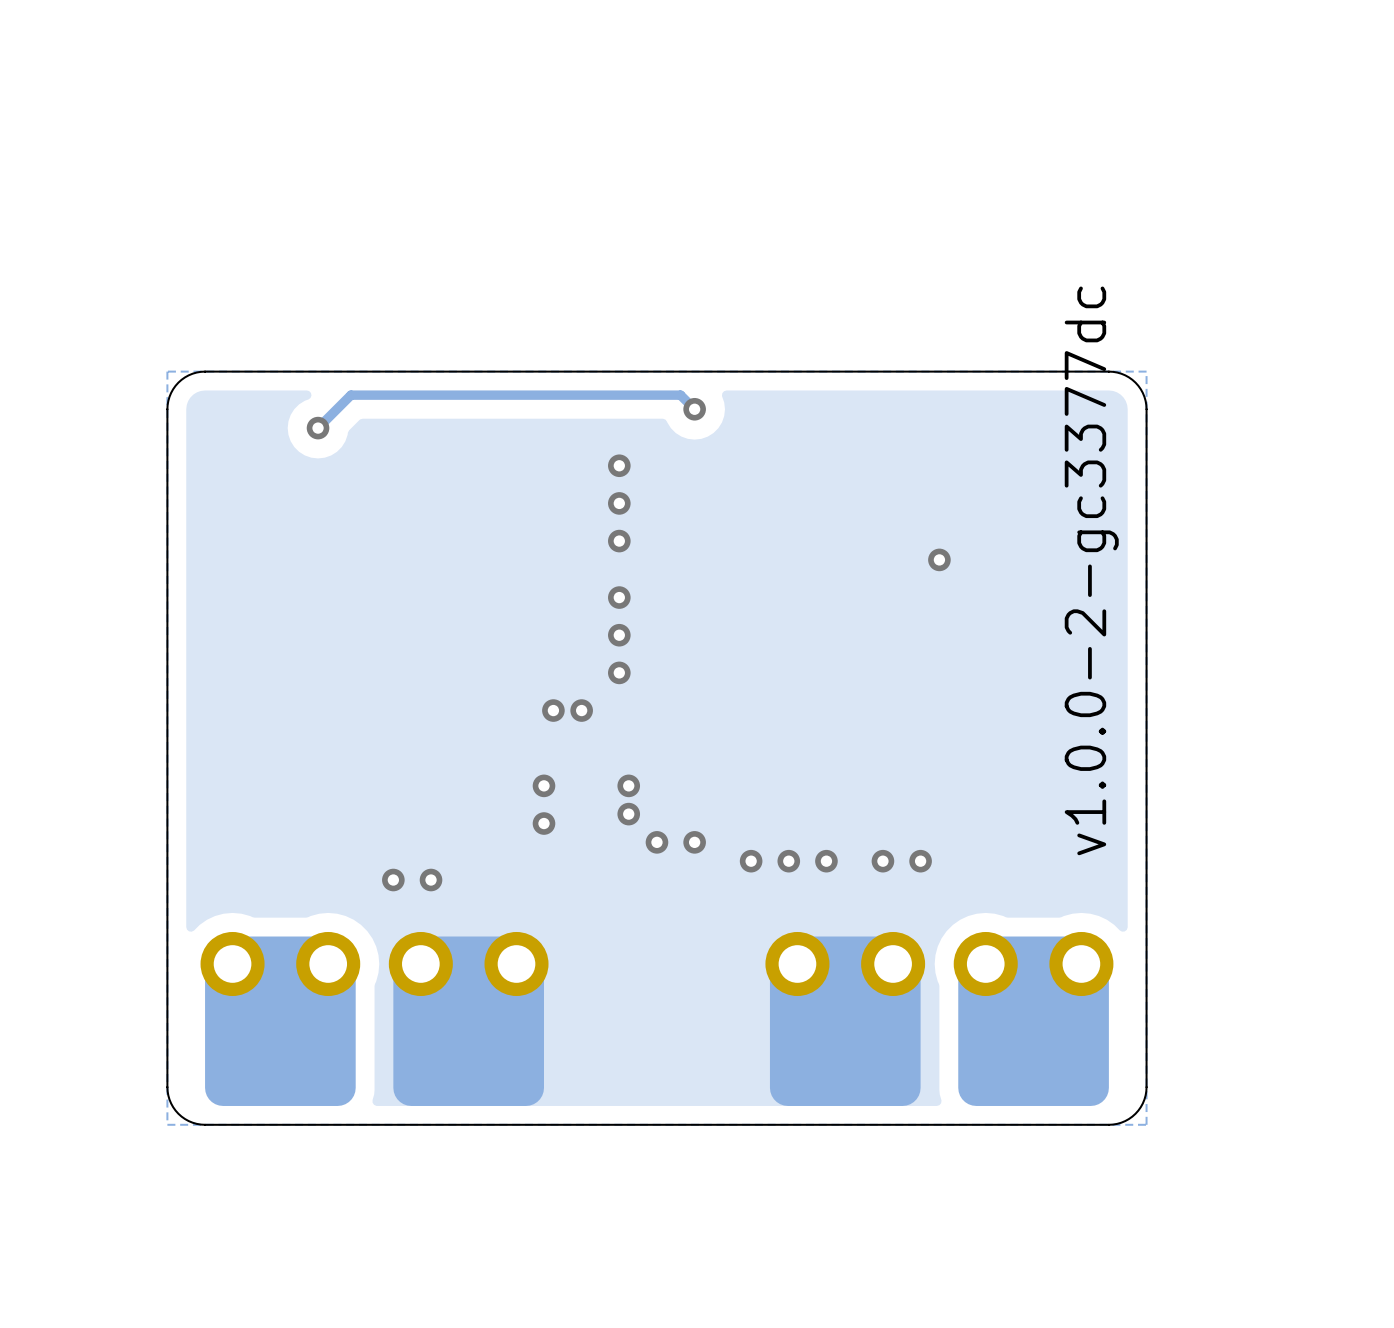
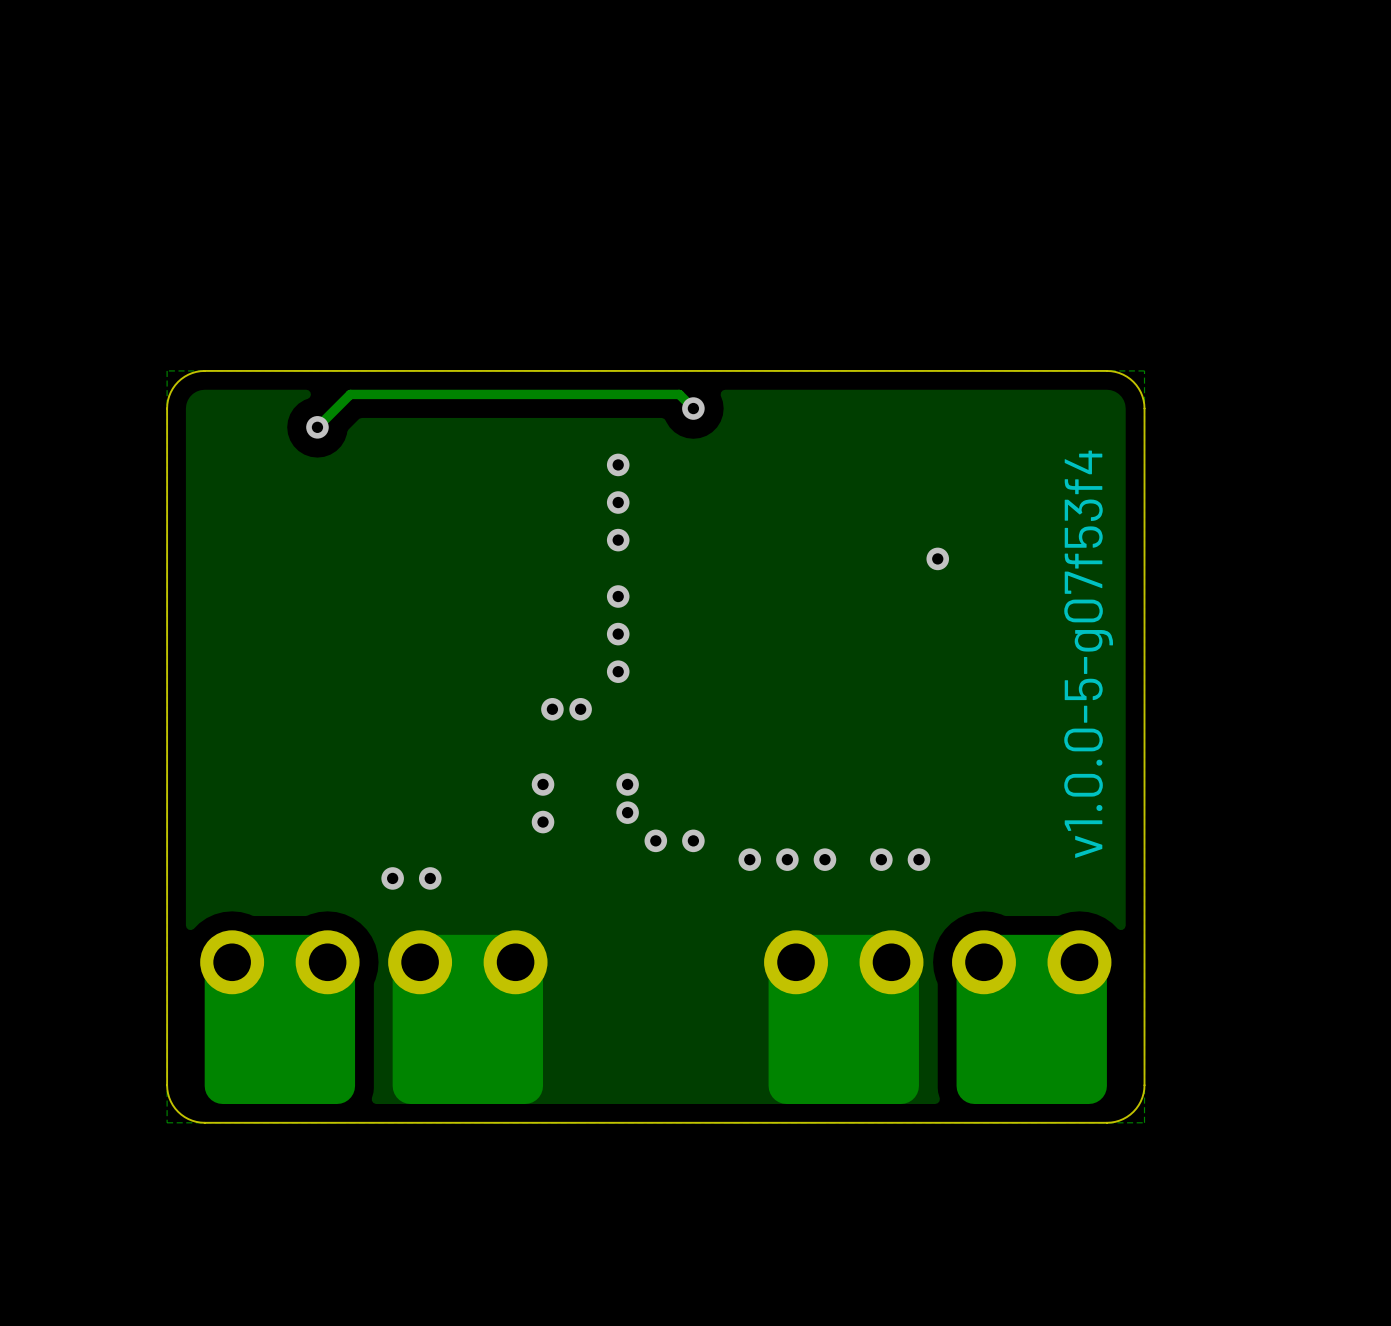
text: v1.0.0-2-gc3377dc (1091, 570) -> v1.0.0-5-g07f53f4 (1088, 654)

